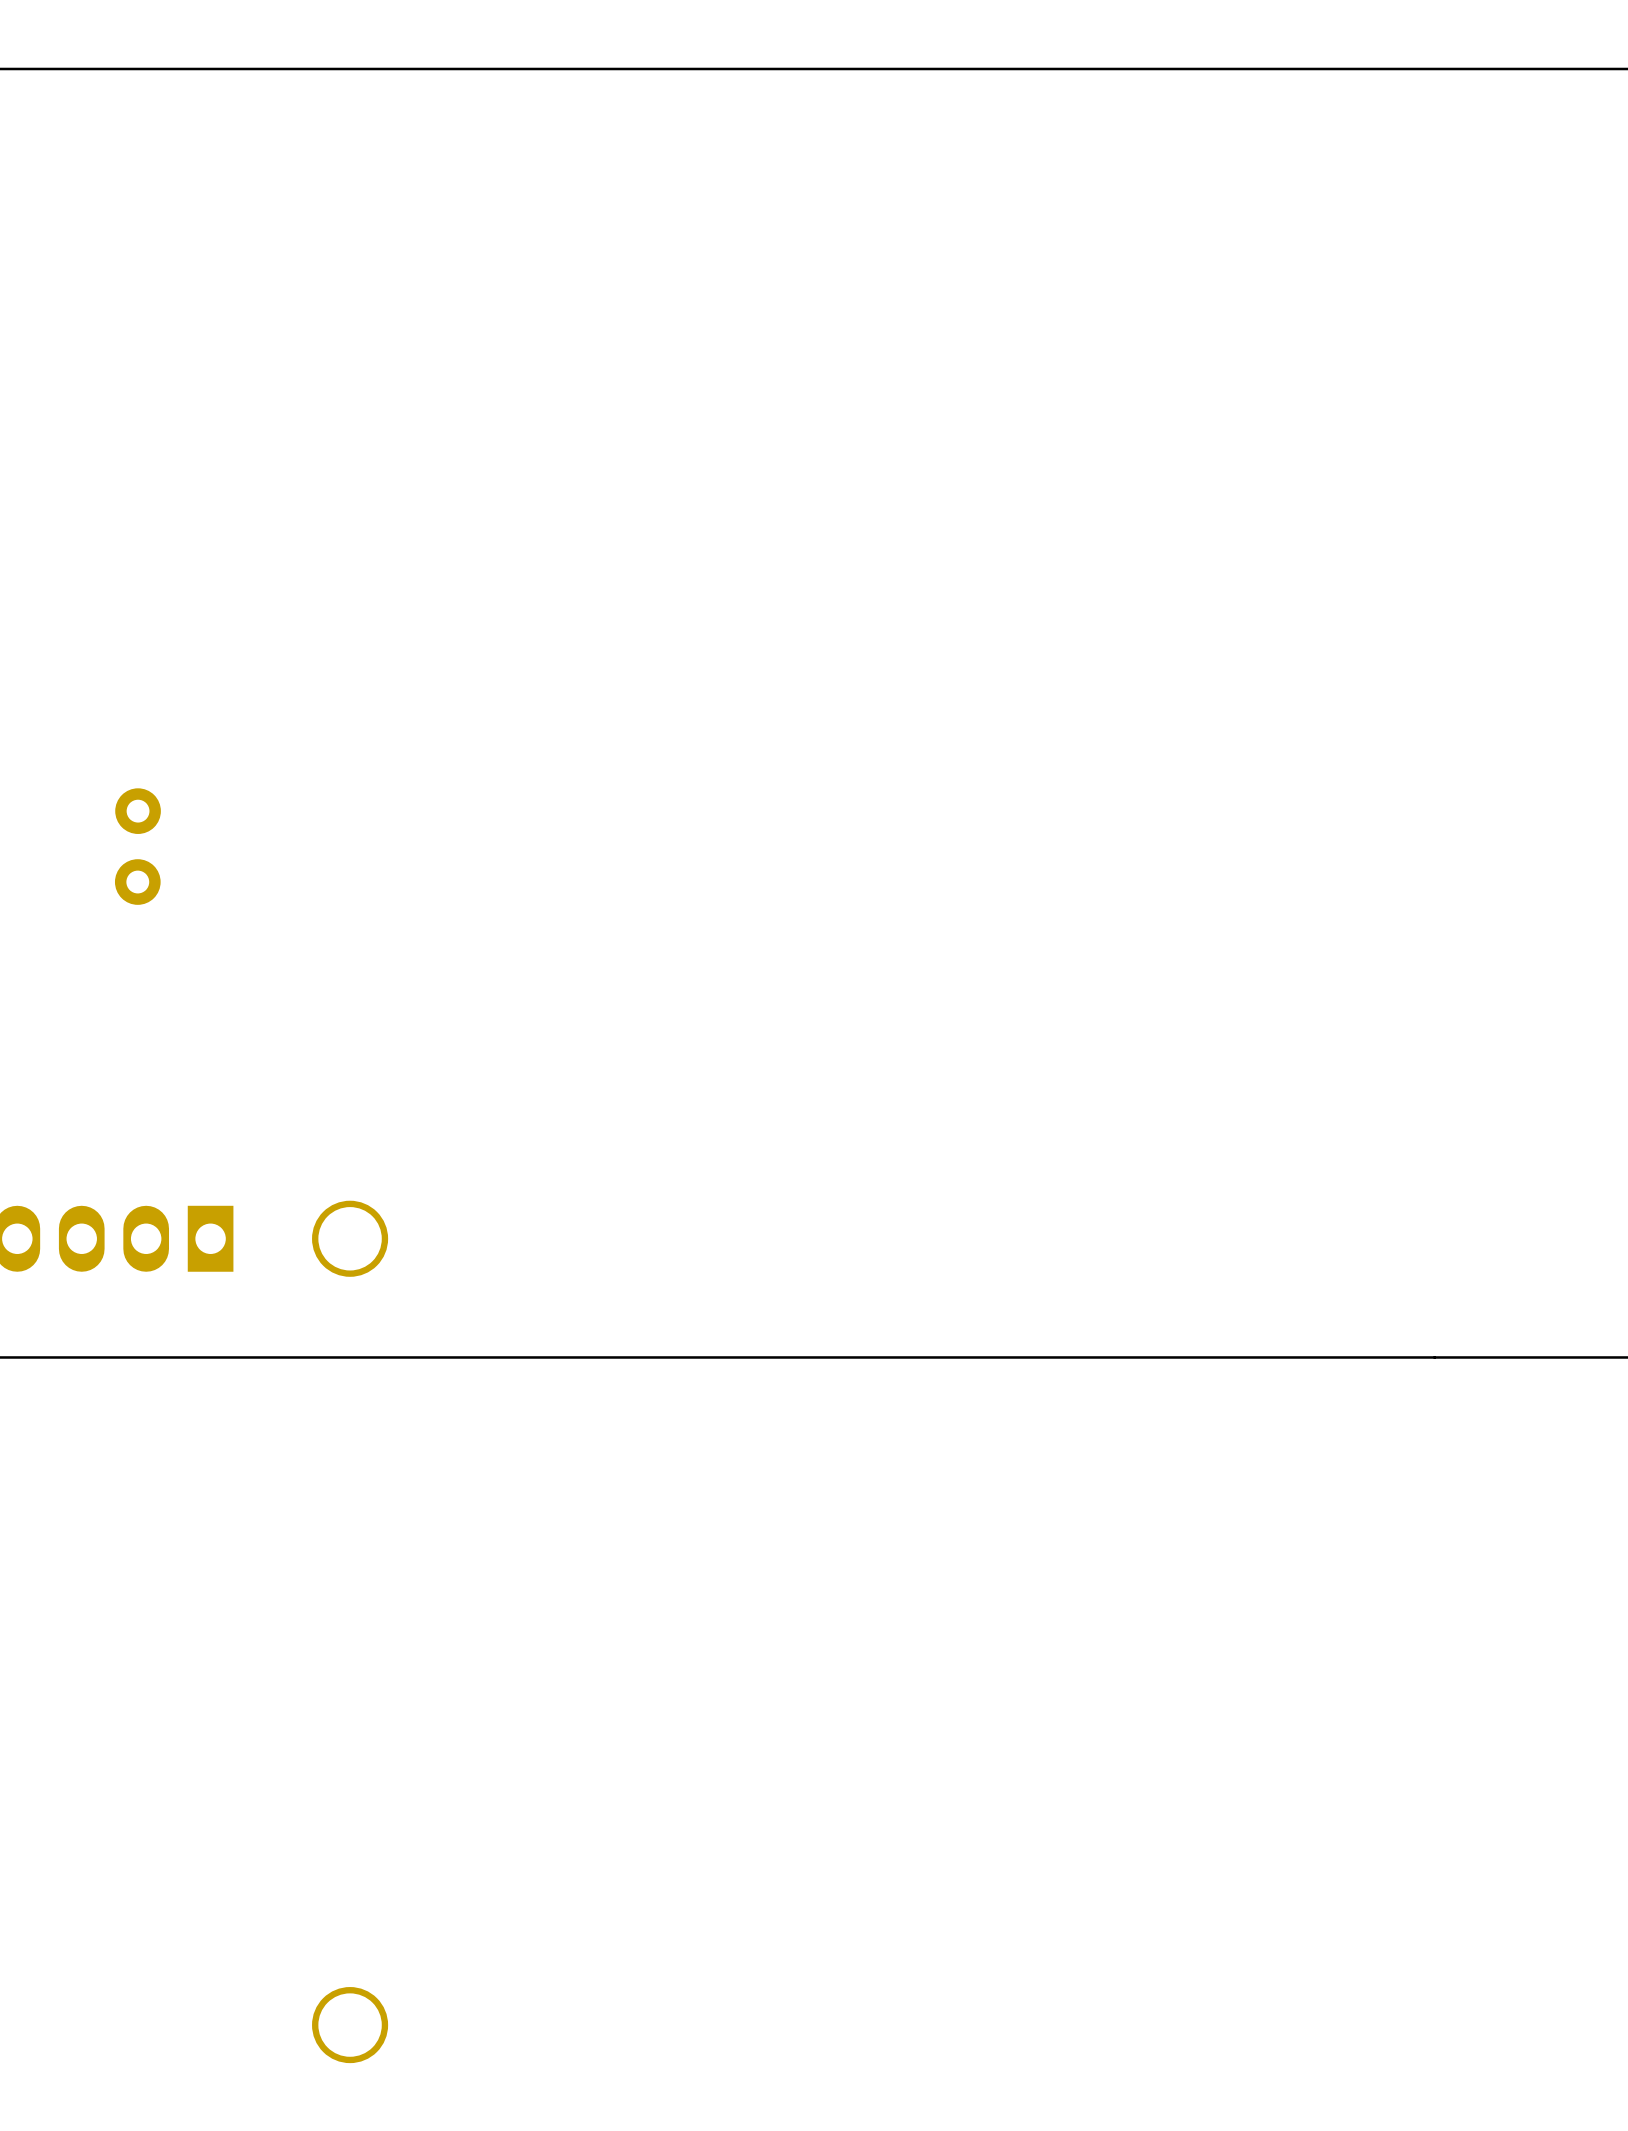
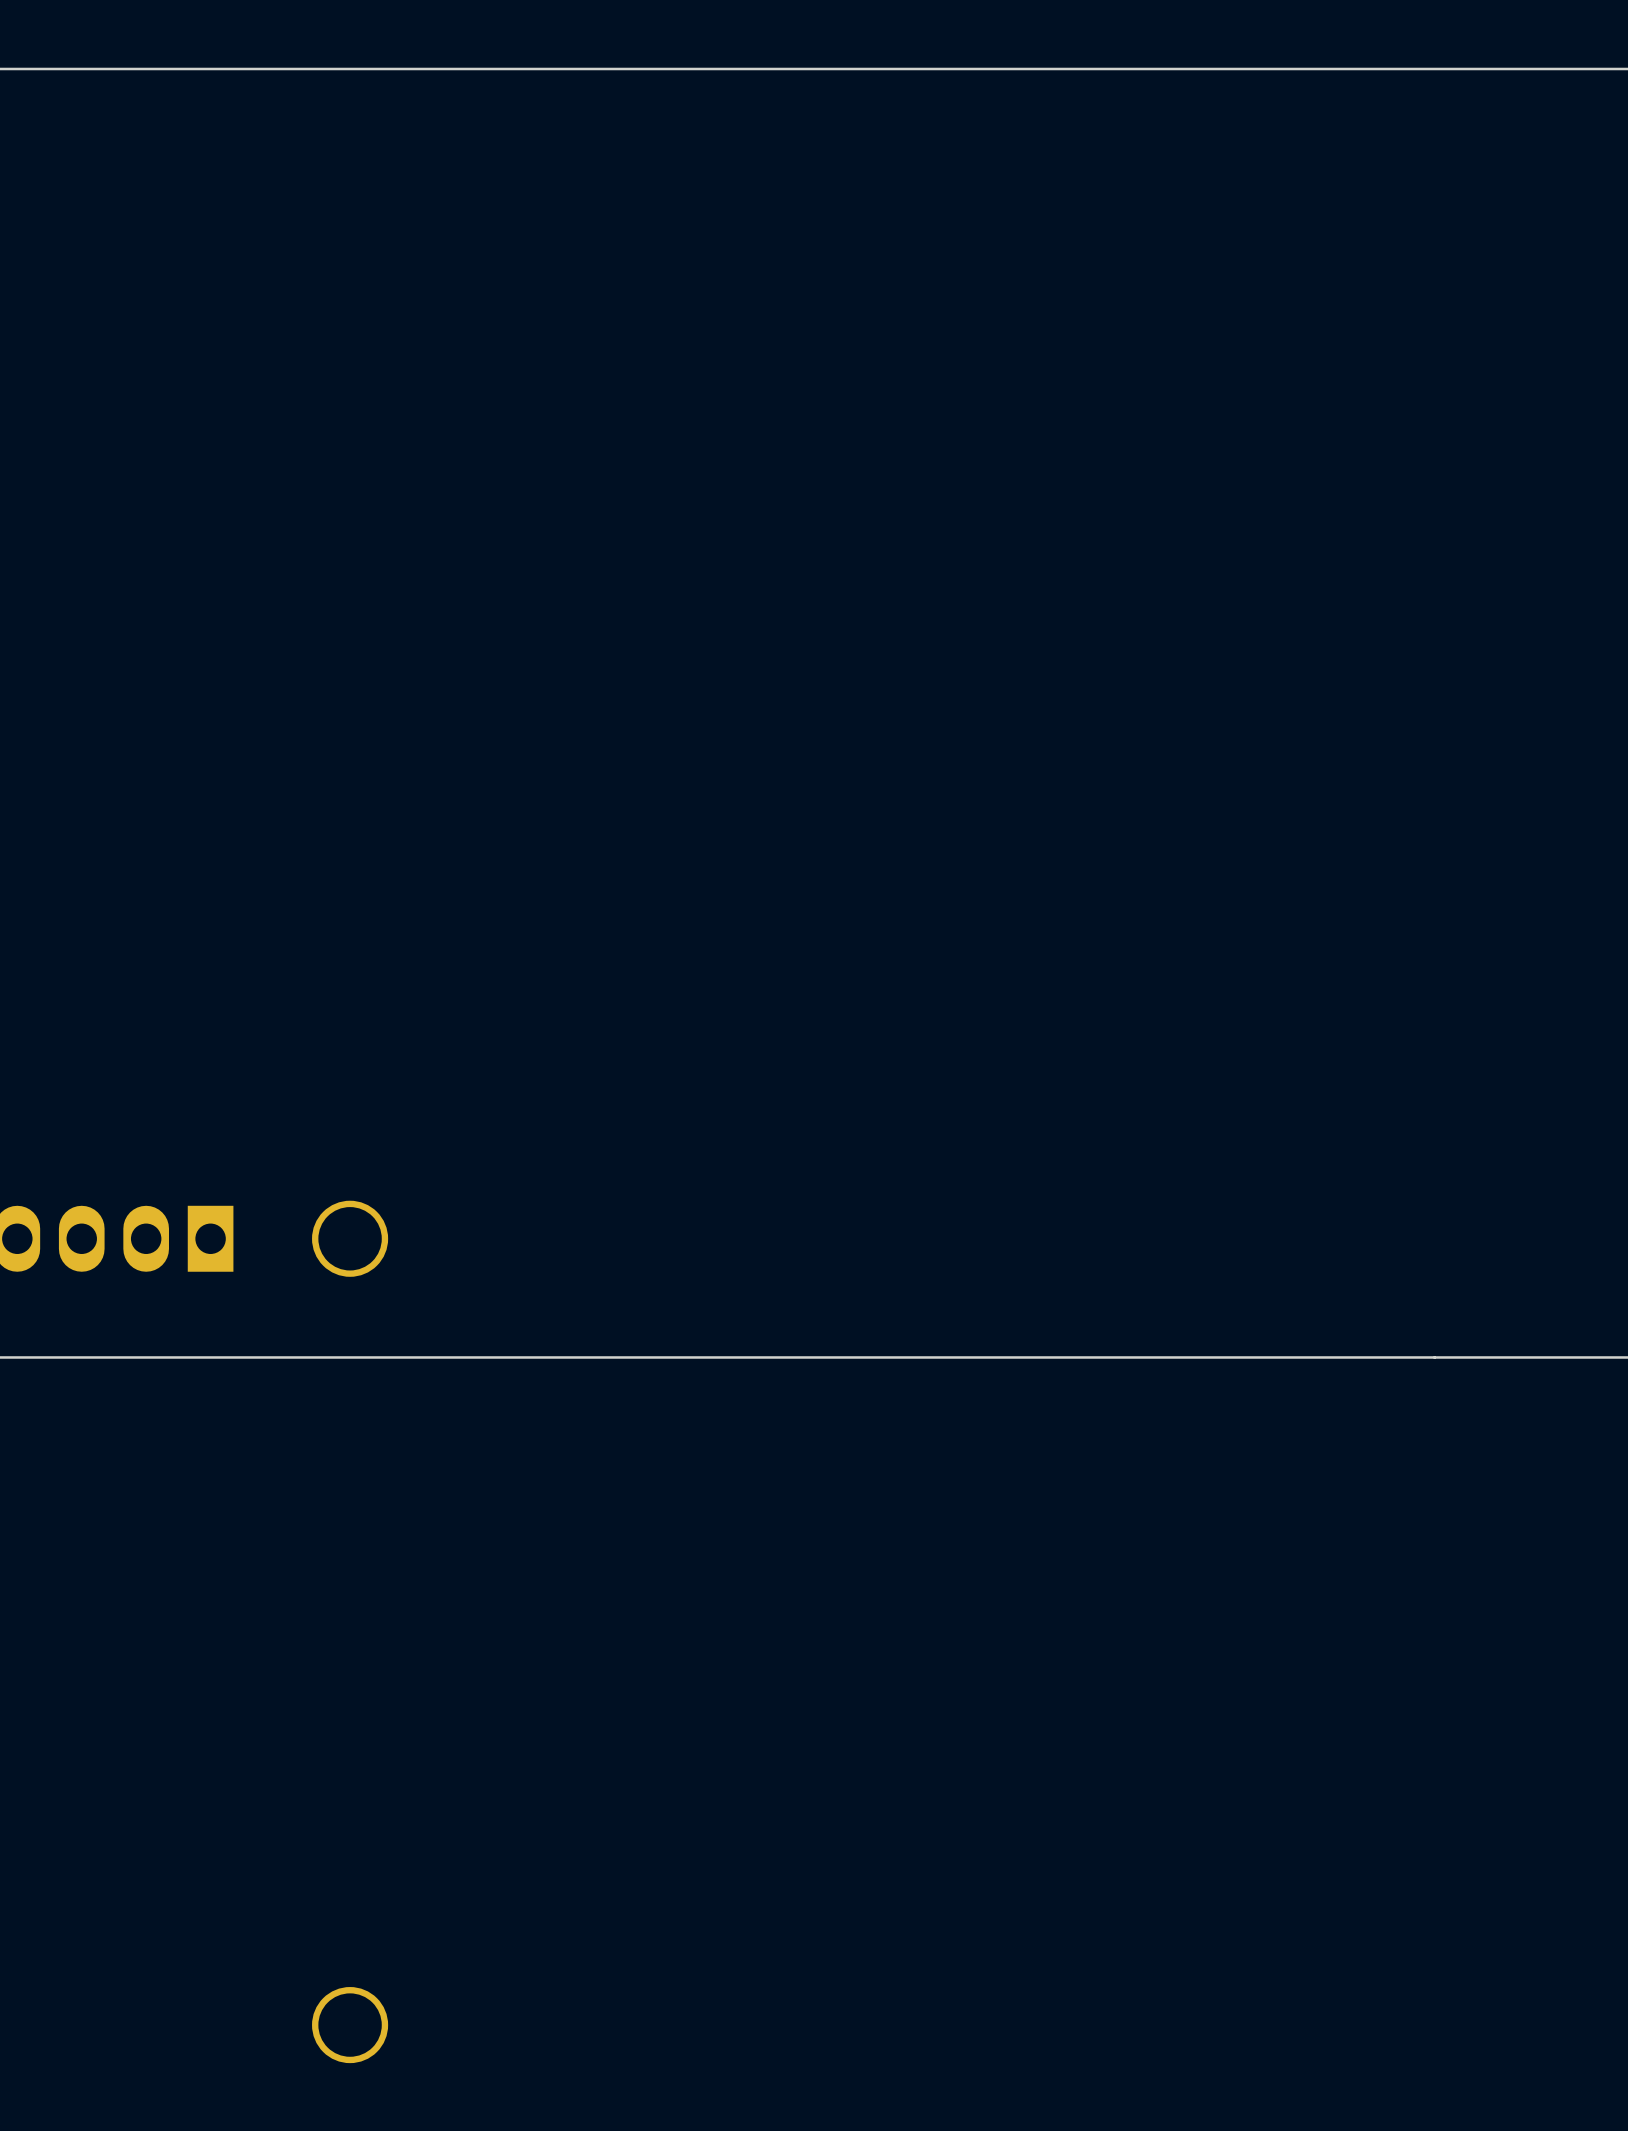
part: (138, 811) -> none
part: (137, 882) -> none

